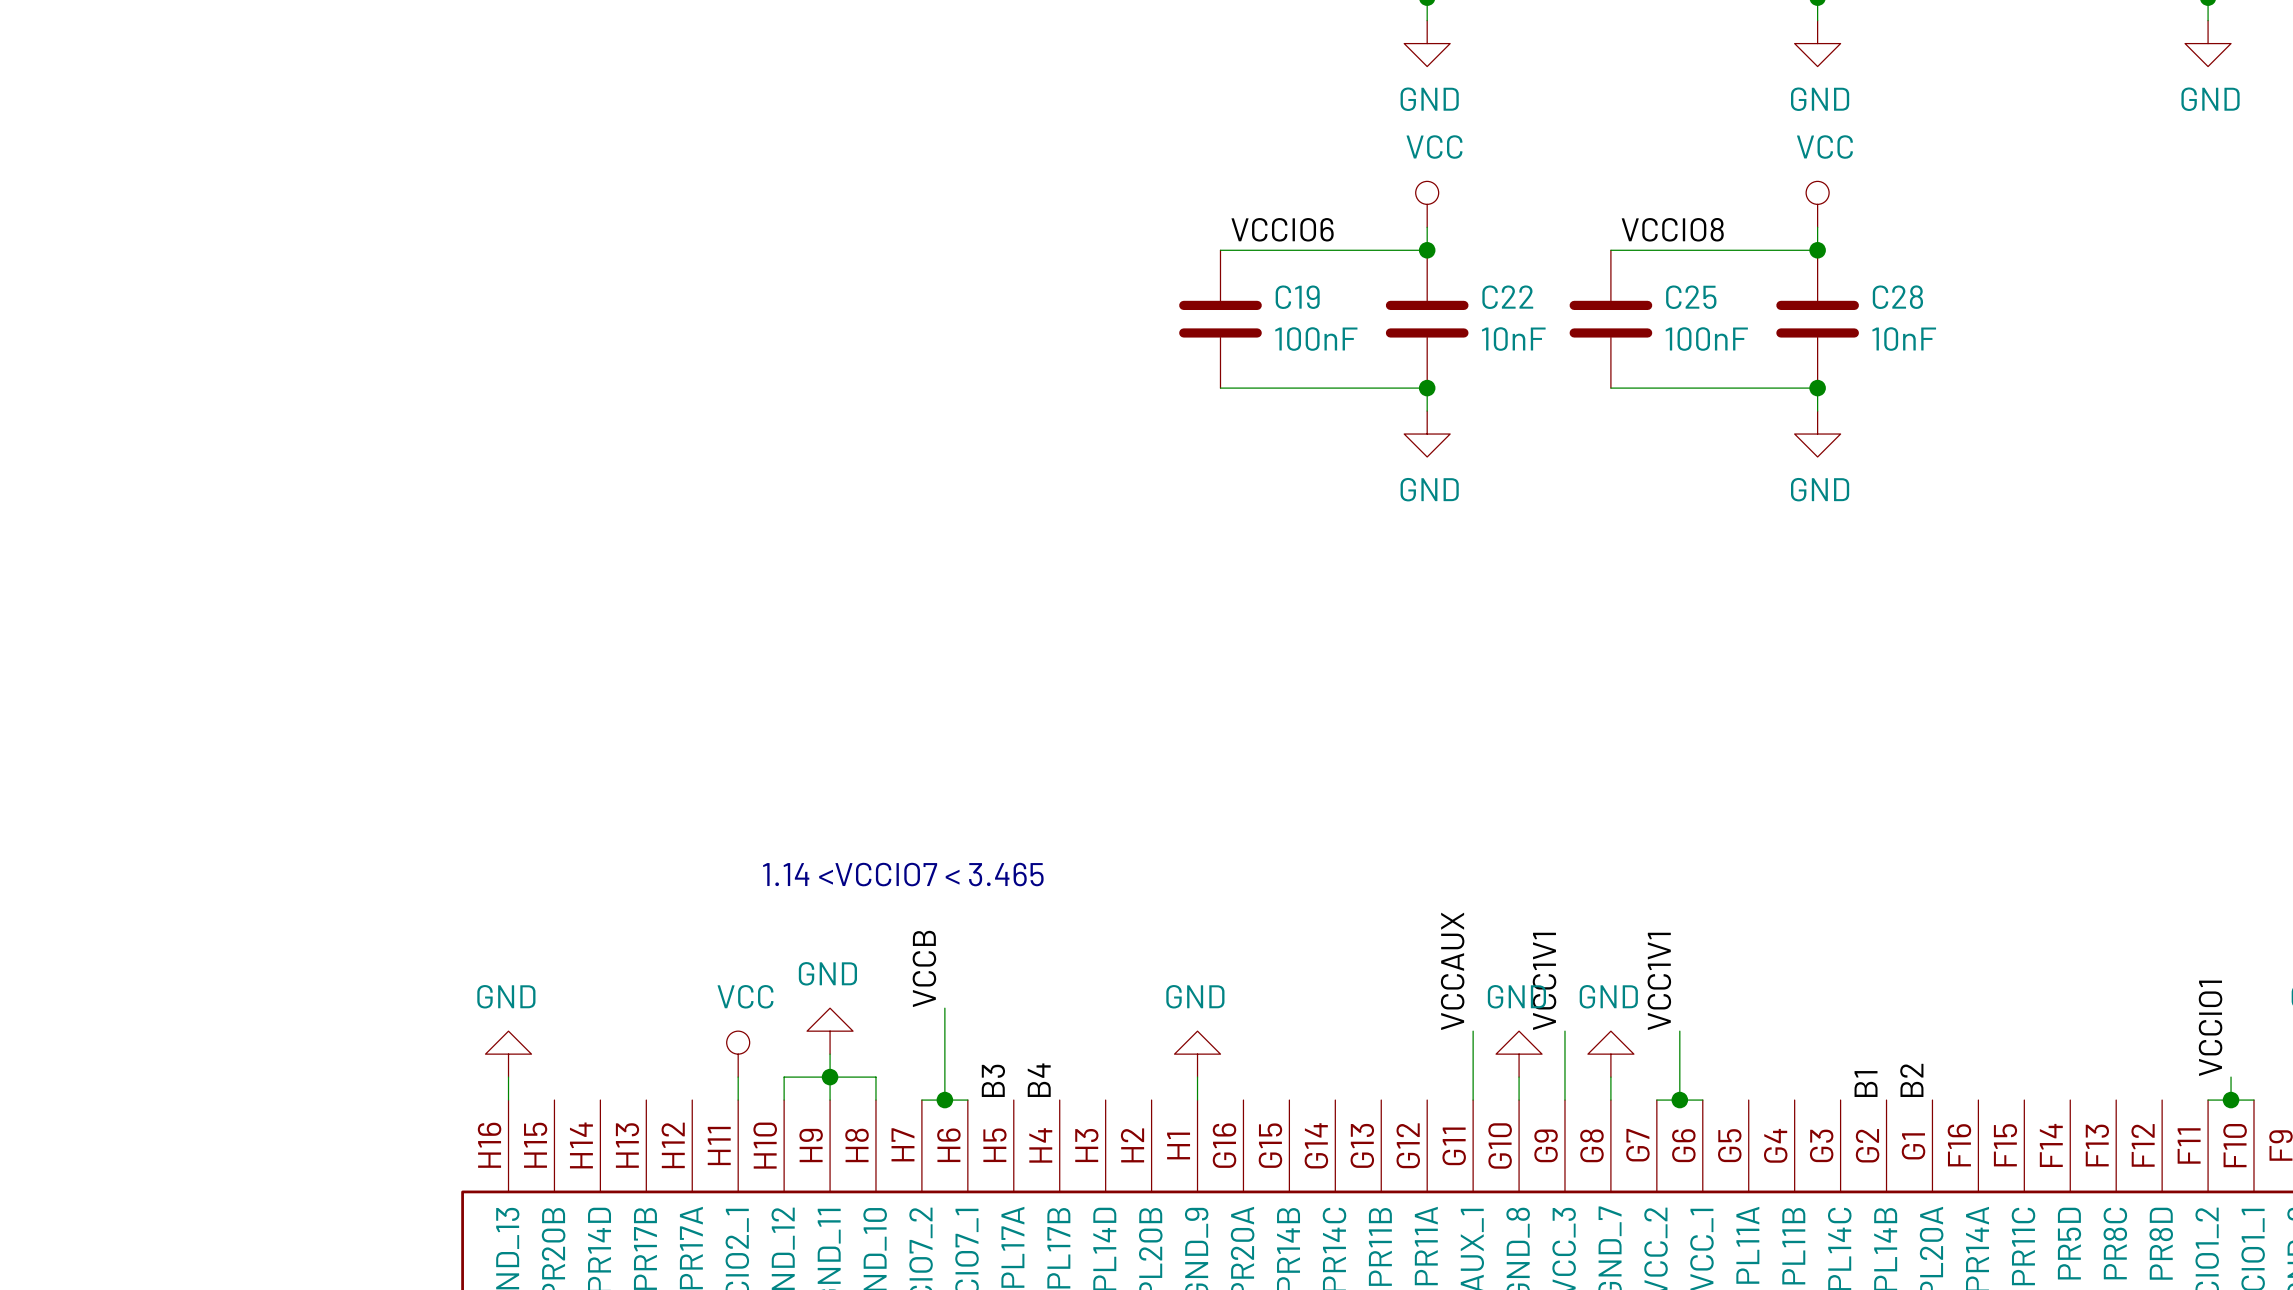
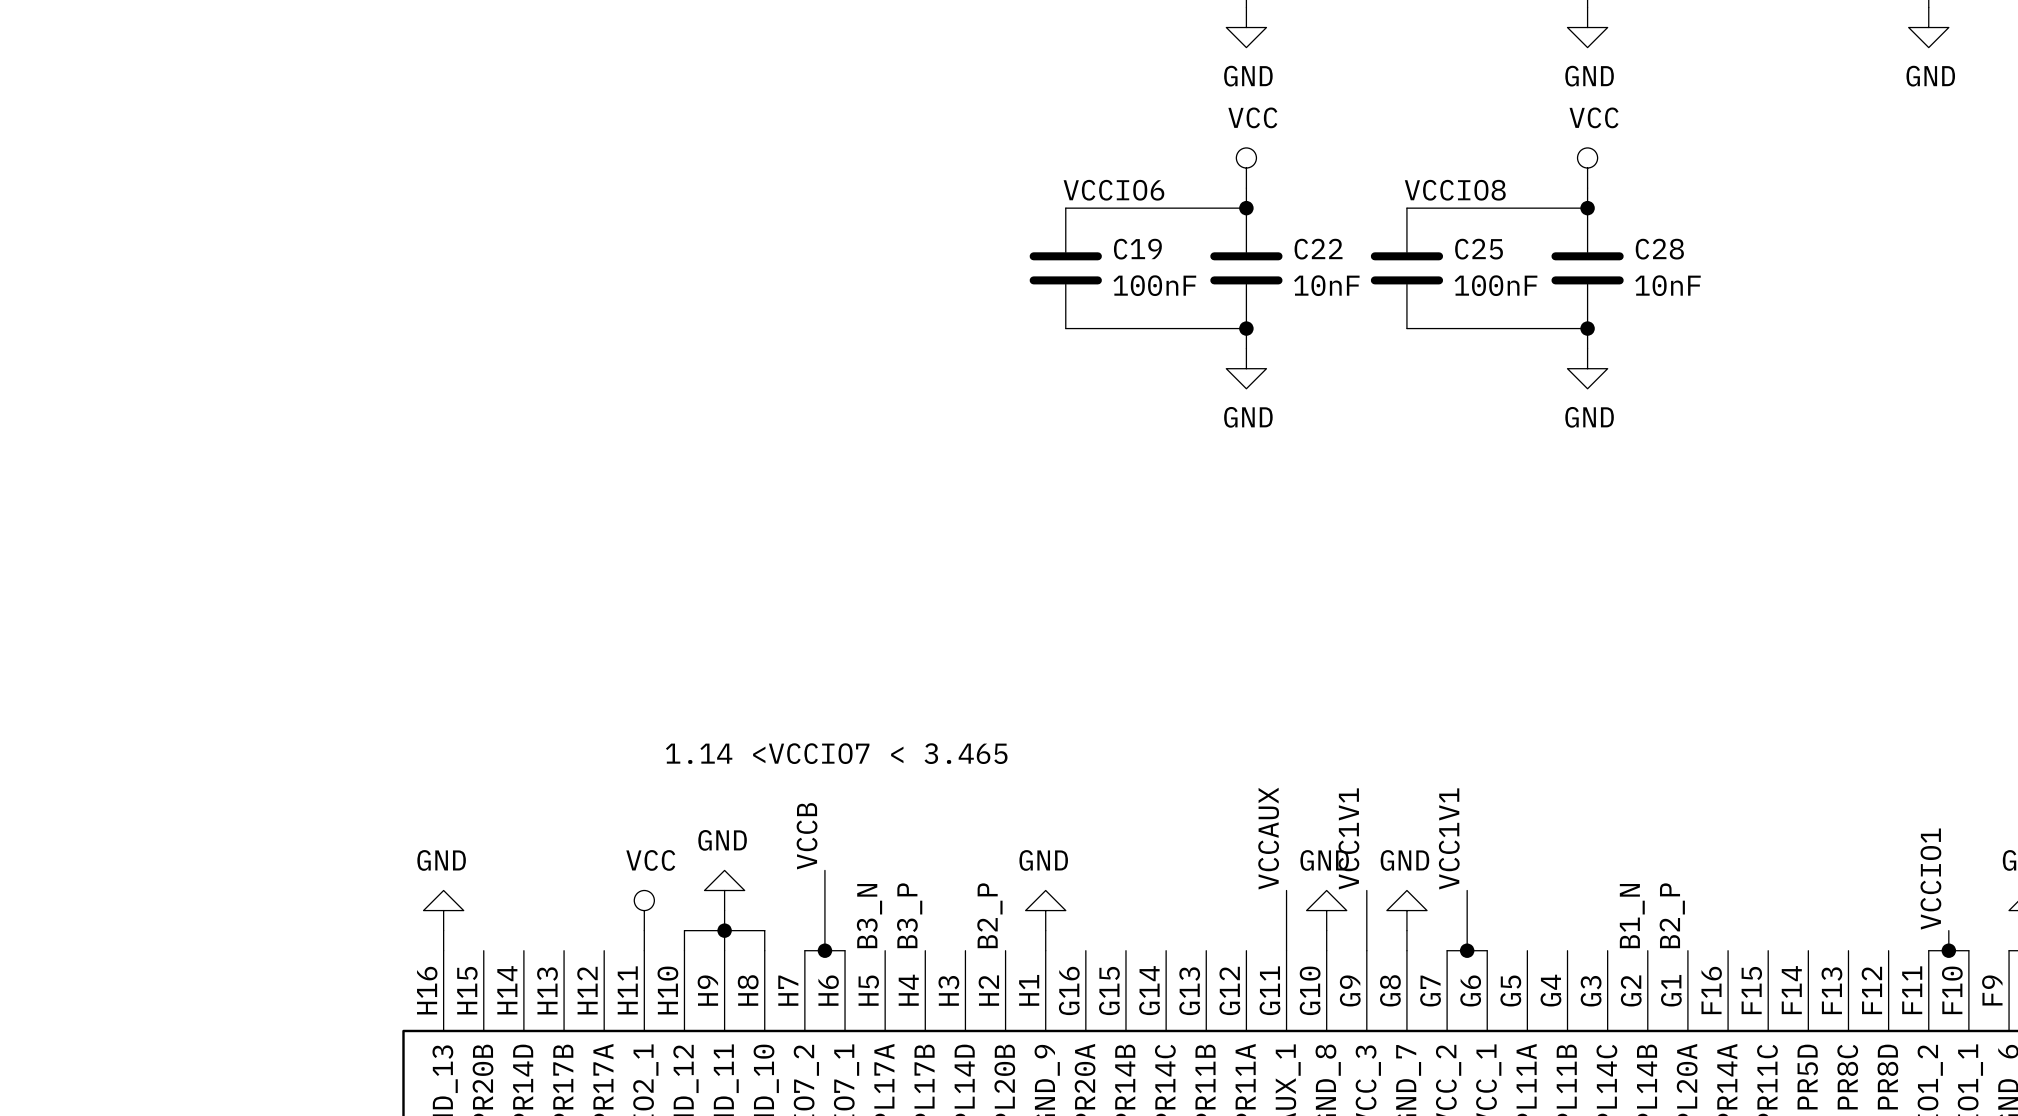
label: none -> B2_P (989, 915)
label: B3 (993, 1080) -> B3_N (869, 916)
label: B4 (1039, 1080) -> B3_P (909, 915)
label: B2 (1911, 1080) -> B2_P (1672, 915)
label: B1 (1866, 1084) -> B1_N (1632, 916)

